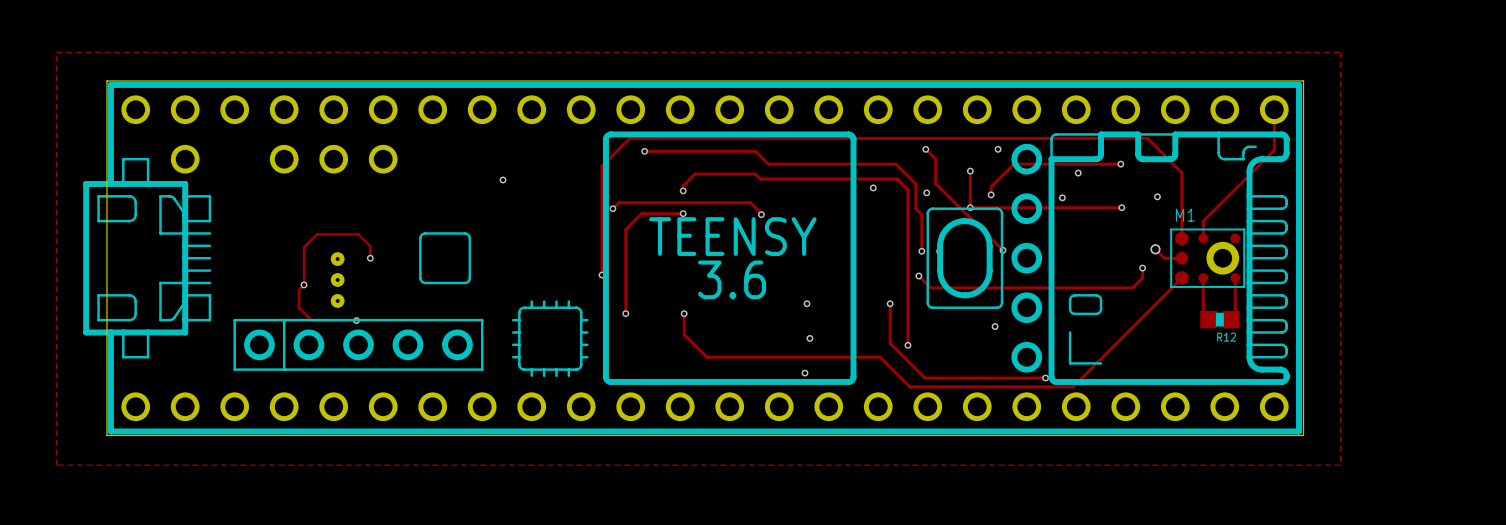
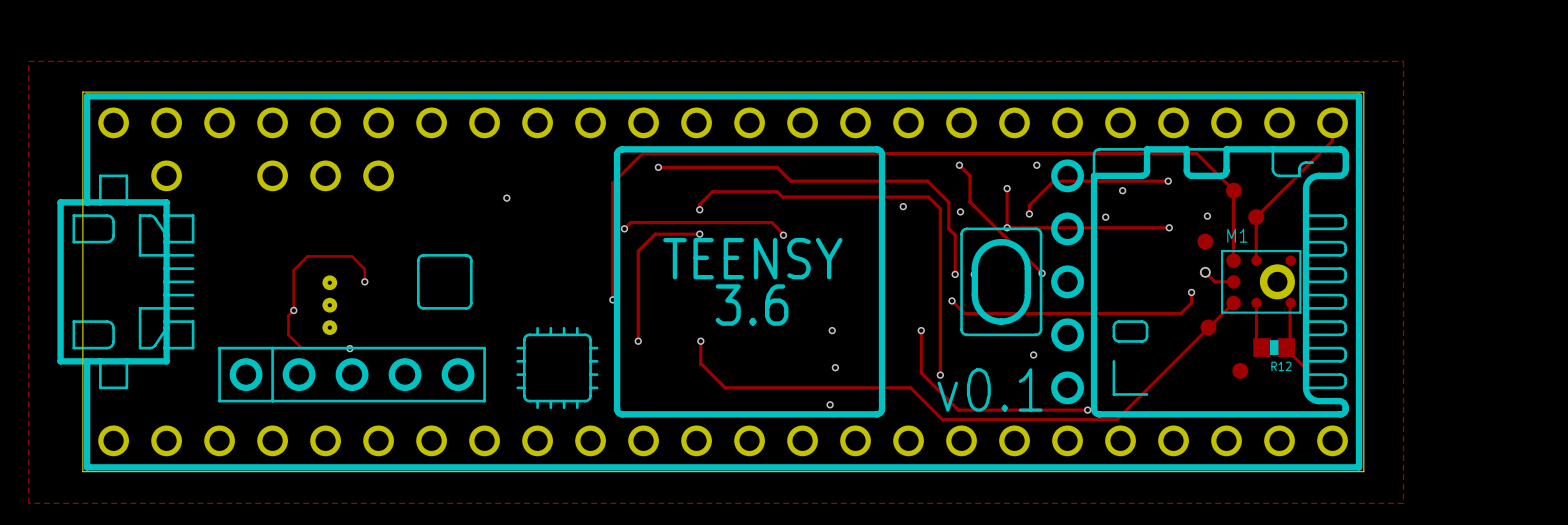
track: (1274, 126) (1274, 150) (1203, 221) (1203, 238) -> (1332, 140) (1256, 217) (1256, 260)
part: none -> (1233, 190)
part: none -> (1256, 217)
part: none -> (1205, 241)
track: (1235, 278) (1235, 315) -> (1290, 303) (1290, 352) (1308, 370)
part: none -> (1208, 327)
part: none -> (1240, 370)
text: none -> v0.1 (990, 389)

